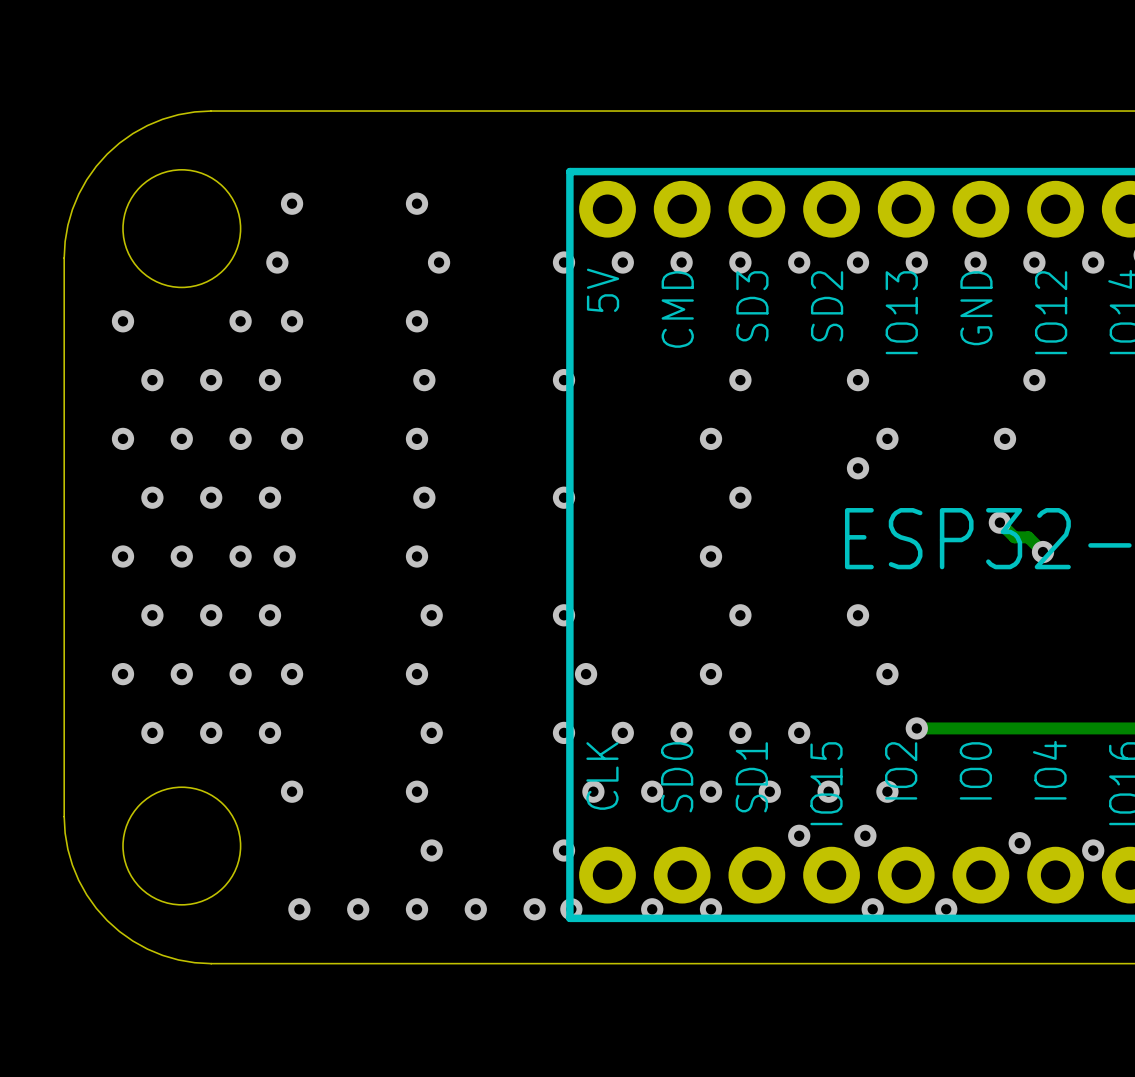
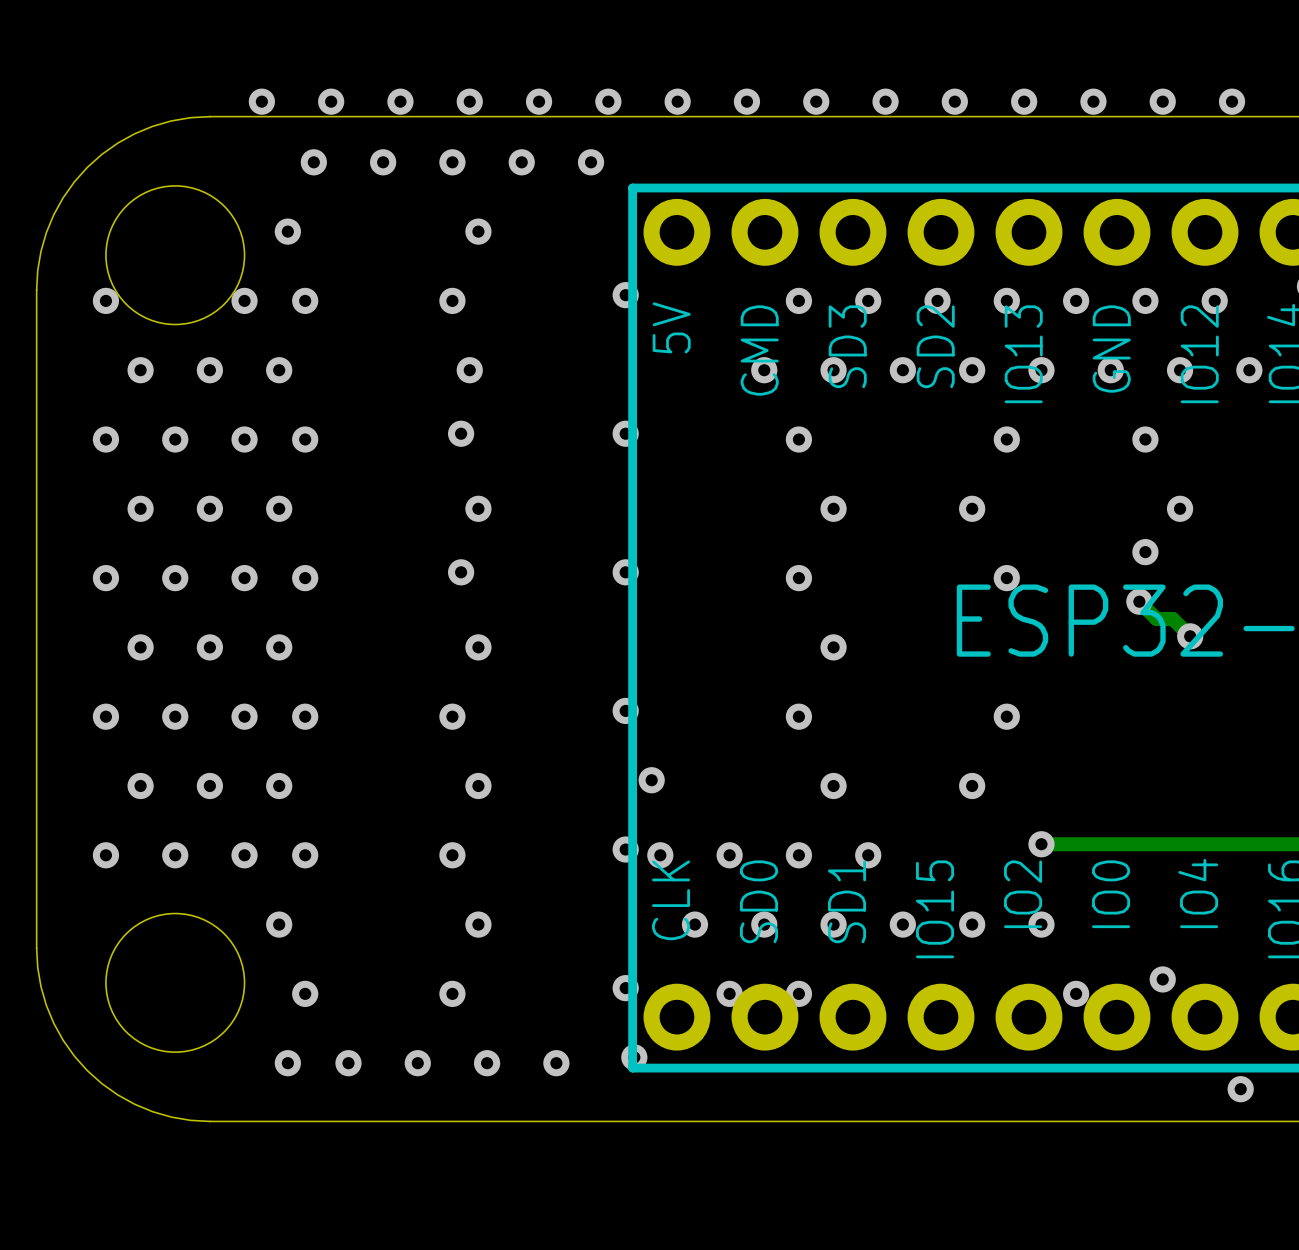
via: none -> (261, 101)
via: none -> (331, 101)
via: none -> (400, 101)
via: none -> (469, 101)
via: none -> (539, 101)
via: none -> (608, 101)
via: none -> (677, 101)
via: none -> (746, 101)
via: none -> (816, 101)
via: none -> (885, 101)
via: none -> (954, 101)
via: none -> (1024, 101)
via: none -> (1093, 101)
via: none -> (1162, 101)
via: none -> (1232, 101)
via: none -> (313, 162)
via: none -> (383, 162)
via: none -> (452, 162)
via: none -> (521, 162)
via: none -> (591, 162)
via position: (292, 203) -> (287, 231)
via position: (417, 203) -> (478, 231)
via position: (277, 262) -> (305, 300)
via position: (439, 262) -> (452, 300)
via: (622, 262) -> none
via: (681, 262) -> none
via: (740, 262) -> none
via: (799, 262) -> none
via: (858, 262) -> none
via: (916, 262) -> none
via: (975, 262) -> none
via: (1034, 262) -> none
via: (1093, 262) -> none
via: none -> (105, 300)
via: none -> (244, 300)
via: none -> (798, 300)
via: none -> (868, 300)
via: none -> (937, 300)
via: none -> (1006, 300)
via: none -> (1076, 300)
via: none -> (1145, 300)
via: none -> (1214, 300)
via: (123, 321) -> none
via: (240, 321) -> none
via position: (292, 321) -> (279, 370)
via position: (417, 321) -> (469, 370)
via: none -> (140, 370)
via: none -> (209, 370)
via: none -> (764, 370)
via: none -> (833, 370)
via: none -> (902, 370)
via: none -> (972, 370)
via: none -> (1041, 370)
via: none -> (1110, 370)
via: none -> (1180, 370)
via: none -> (1249, 370)
via: (152, 380) -> none
via: (211, 380) -> none
via position: (270, 380) -> (305, 439)
via: (740, 380) -> none
via: (858, 380) -> none
via: (1034, 380) -> none
via: none -> (105, 439)
via: none -> (175, 439)
via: none -> (244, 439)
via: none -> (798, 439)
via: none -> (1006, 439)
via: none -> (1145, 439)
via: (123, 438) -> none
via: (181, 438) -> none
via: (240, 438) -> none
via position: (292, 438) -> (279, 508)
via position: (417, 438) -> (478, 508)
via: (711, 438) -> none
via: (887, 438) -> none
via: (1005, 438) -> none
via: none -> (140, 508)
via: none -> (209, 508)
via: none -> (833, 508)
via: none -> (972, 508)
via: none -> (1180, 508)
via: (858, 468) -> none
via: none -> (1145, 552)
via: (152, 497) -> none
via: (211, 497) -> none
via position: (270, 497) -> (305, 578)
via: (740, 497) -> none
via: none -> (105, 578)
via: none -> (175, 578)
via: none -> (244, 578)
via: none -> (798, 578)
via: none -> (1006, 578)
via: (123, 556) -> none
via: (181, 556) -> none
via: (240, 556) -> none
via position: (284, 556) -> (279, 647)
via position: (417, 556) -> (478, 647)
via: (711, 556) -> none
via: none -> (140, 647)
via: none -> (209, 647)
via: none -> (833, 647)
via: (152, 615) -> none
via: (211, 615) -> none
via position: (270, 615) -> (305, 716)
via position: (431, 615) -> (452, 716)
via: (740, 615) -> none
via: (858, 615) -> none
via: none -> (105, 716)
via: none -> (175, 716)
via: none -> (244, 716)
via: none -> (798, 716)
via: none -> (1006, 716)
via: (123, 674) -> none
via: (181, 674) -> none
via: (240, 674) -> none
via position: (292, 674) -> (279, 785)
via position: (417, 674) -> (478, 785)
via: (711, 674) -> none
via: (887, 674) -> none
via: none -> (140, 785)
via: none -> (209, 785)
via: none -> (833, 785)
via: none -> (972, 785)
via: (152, 732) -> none
via: (211, 732) -> none
via position: (270, 732) -> (305, 855)
via position: (431, 732) -> (452, 855)
via: (622, 732) -> none
via: (681, 732) -> none
via: (740, 732) -> none
via: (799, 732) -> none
via: none -> (105, 855)
via: none -> (175, 855)
via: none -> (244, 855)
via: none -> (660, 855)
via: none -> (729, 855)
via: none -> (798, 855)
via: none -> (868, 855)
via position: (292, 791) -> (279, 924)
via position: (417, 791) -> (478, 924)
via: (593, 791) -> none
via: (652, 791) -> none
via: (711, 791) -> none
via: (769, 791) -> none
via: (828, 791) -> none
via: (887, 791) -> none
via: none -> (694, 924)
via: none -> (764, 924)
via: none -> (833, 924)
via: none -> (902, 924)
via: none -> (972, 924)
via: none -> (1041, 924)
via: (799, 835) -> none
via: (865, 835) -> none
via position: (431, 850) -> (452, 993)
via: (1093, 850) -> none
via: none -> (305, 993)
via: none -> (729, 993)
via: none -> (798, 993)
via: none -> (1076, 993)
via position: (299, 909) -> (287, 1063)
via: (358, 909) -> none
via: (417, 909) -> none
via: (475, 909) -> none
via: (534, 909) -> none
via: (652, 909) -> none
via: (711, 909) -> none
via: (872, 909) -> none
via: (946, 909) -> none
via: none -> (348, 1063)
via: none -> (417, 1063)
via: none -> (487, 1063)
via: none -> (556, 1063)
via: none -> (1240, 1089)

